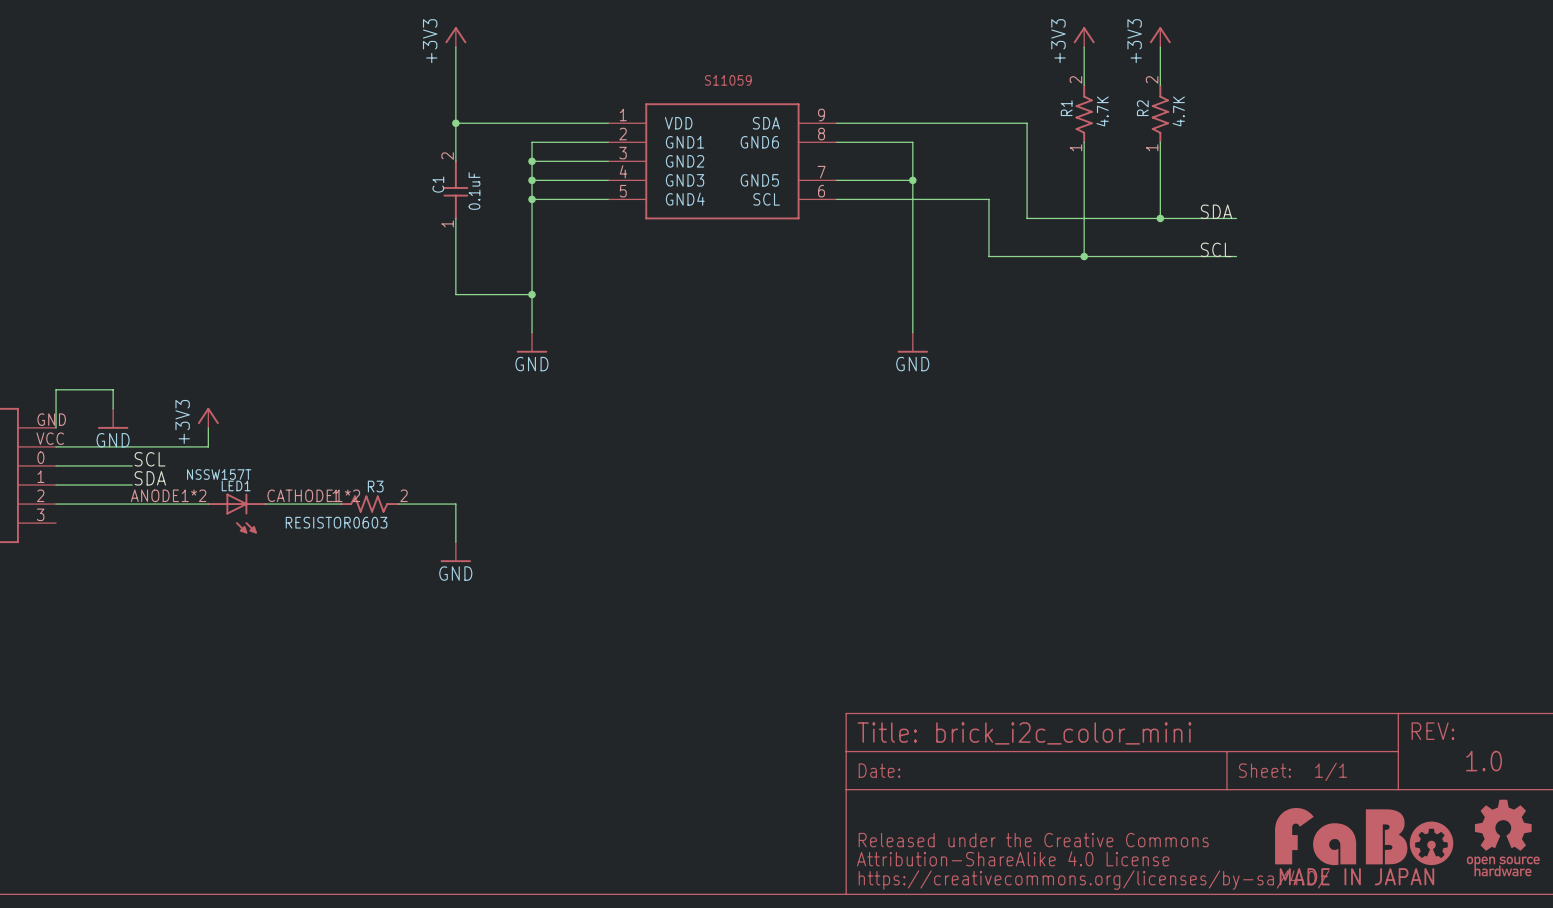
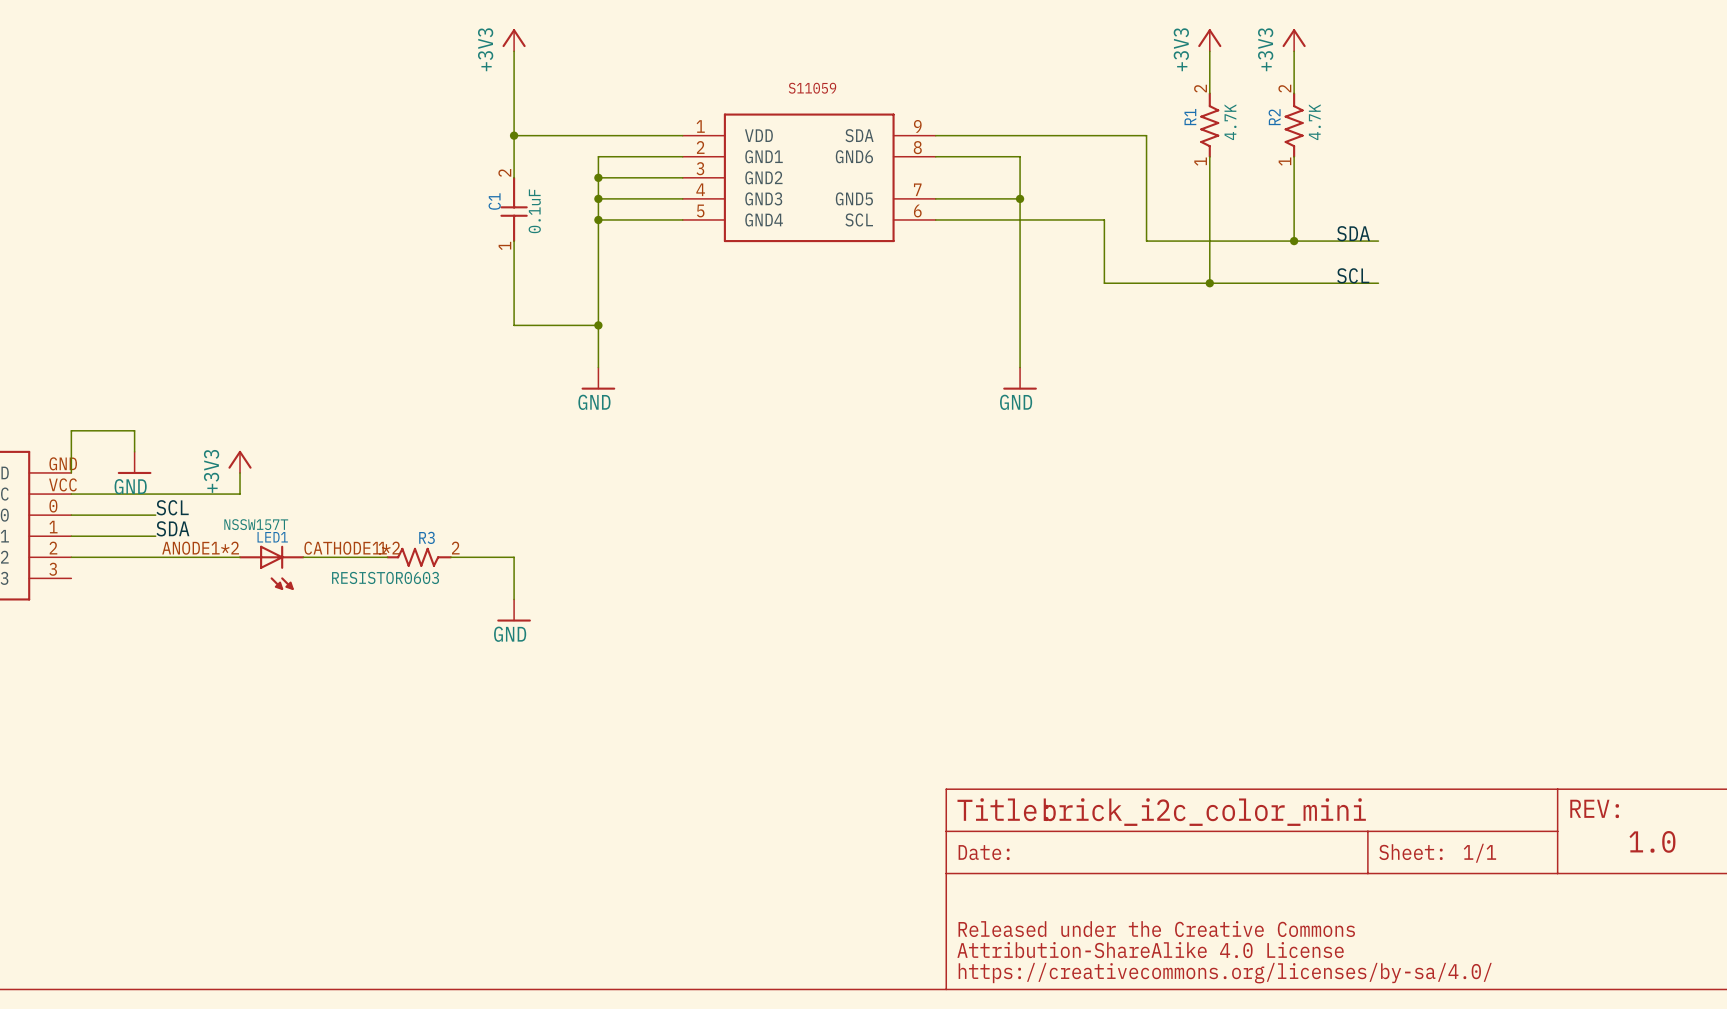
part: (1364, 836) -> none
part: (1503, 838) -> none

